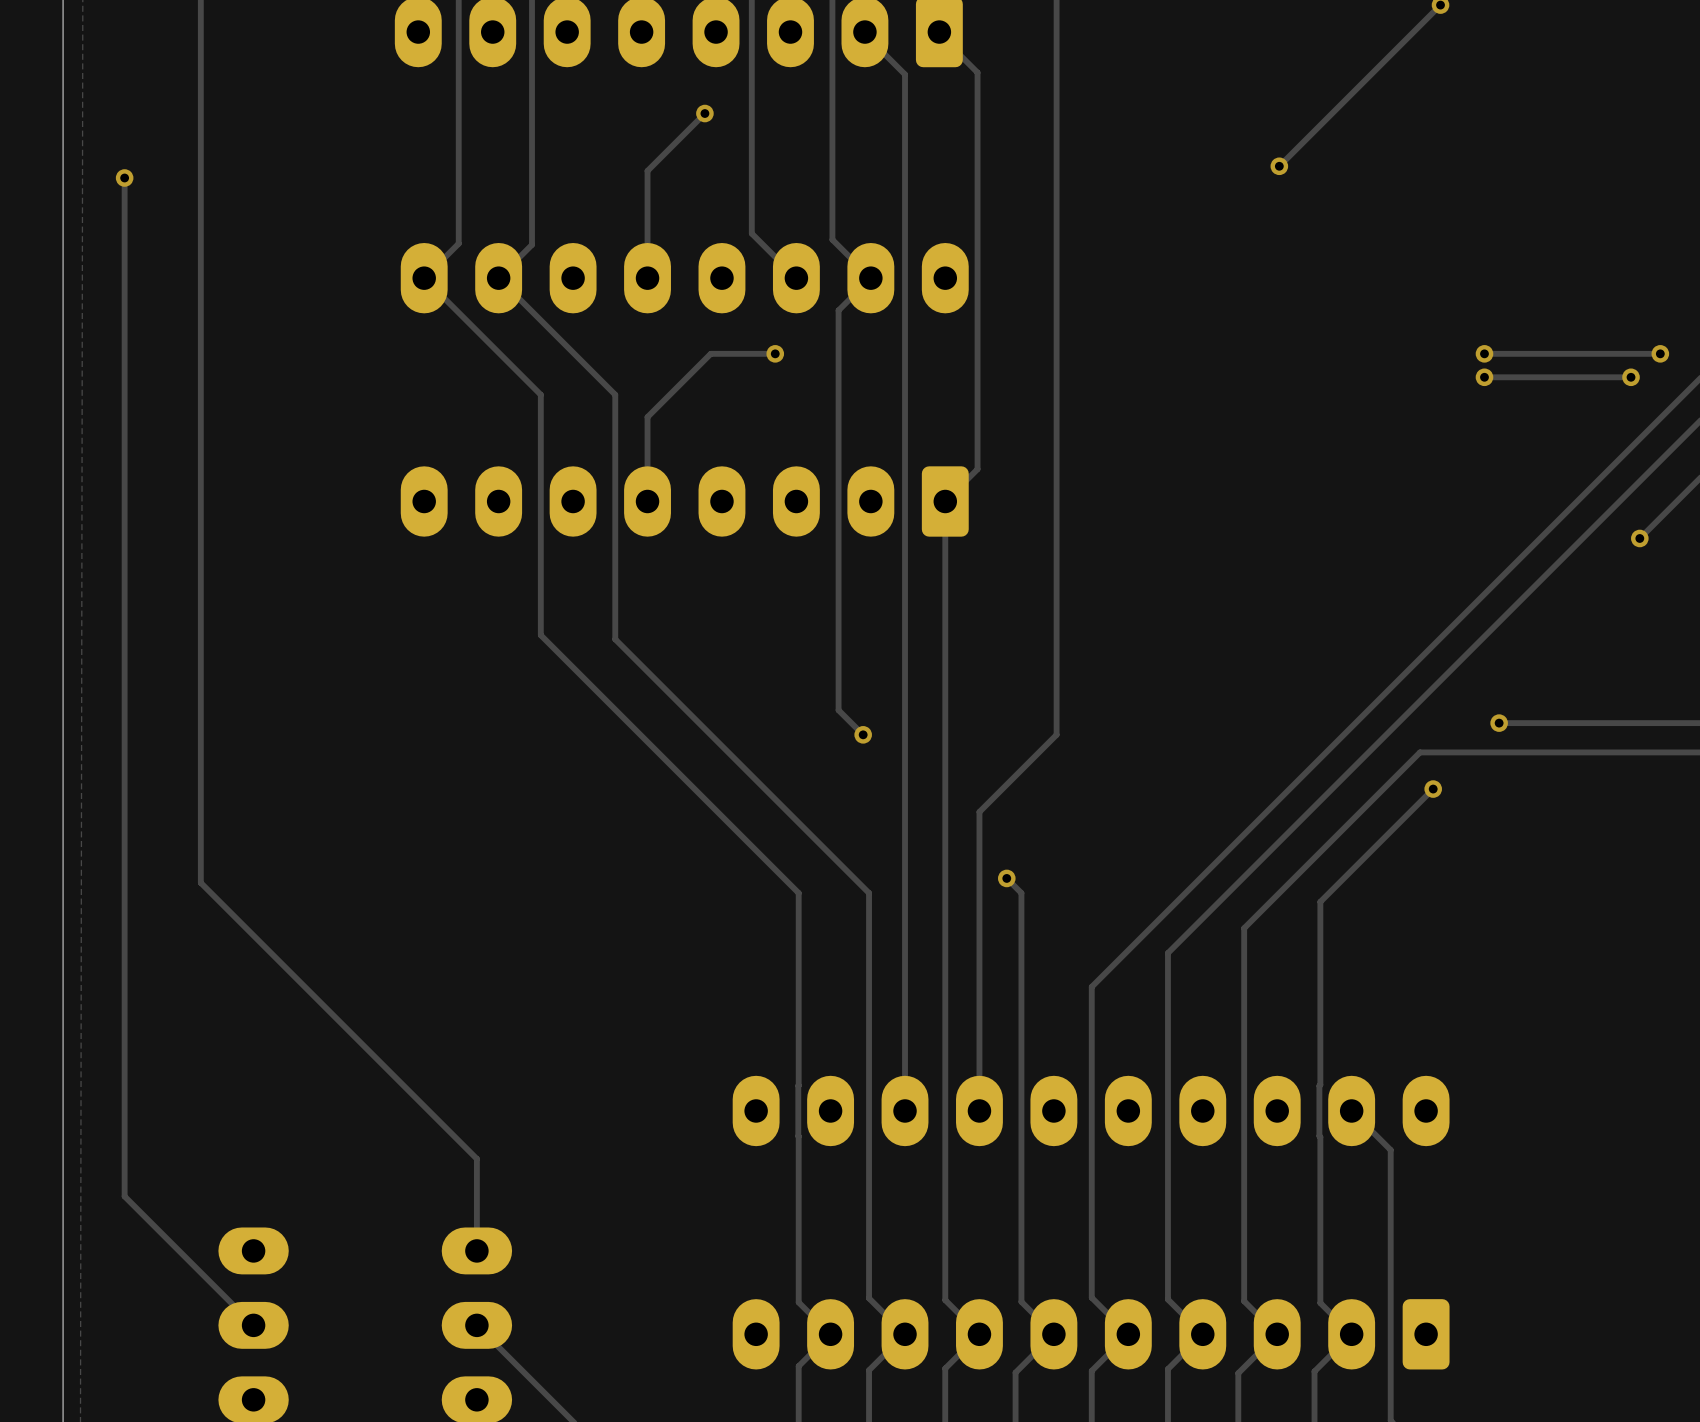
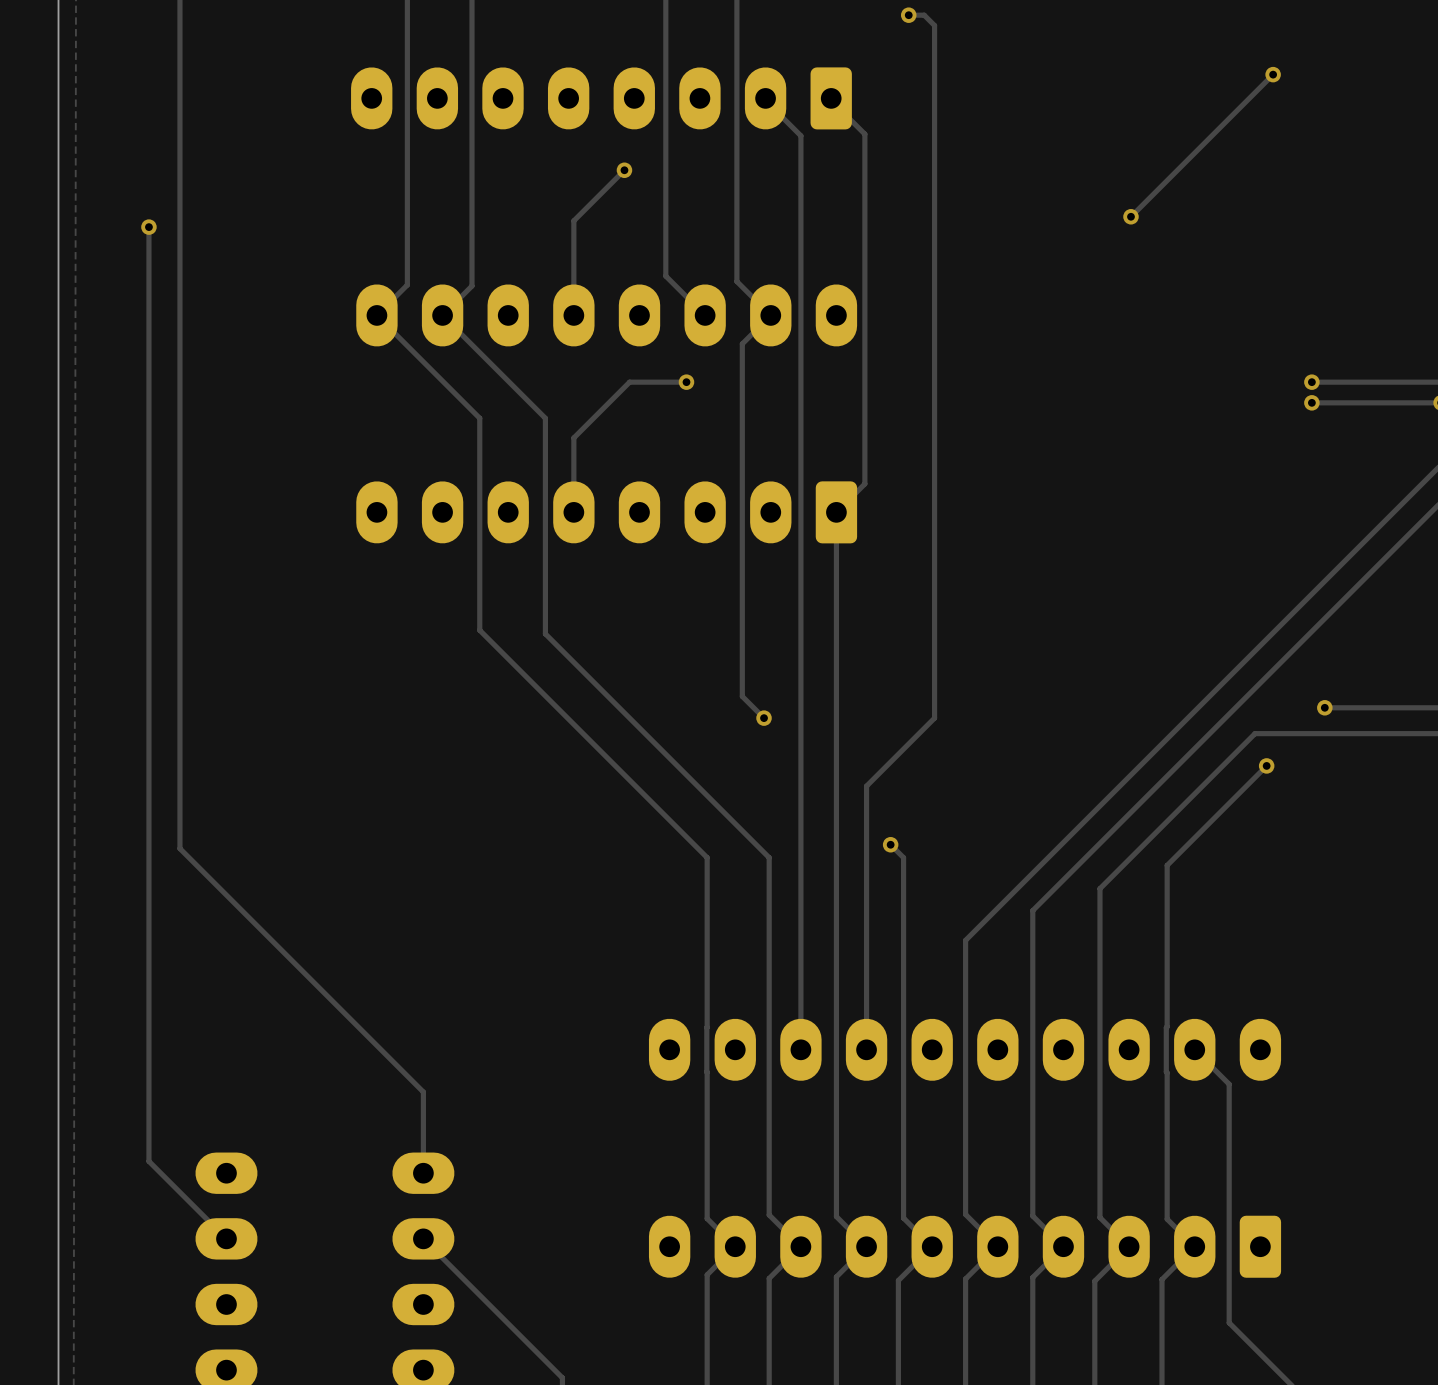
track: (124, 177) (124, 1196) (165, 1237) -> (148, 227) (148, 1161)
via position: (124, 177) -> (148, 227)

